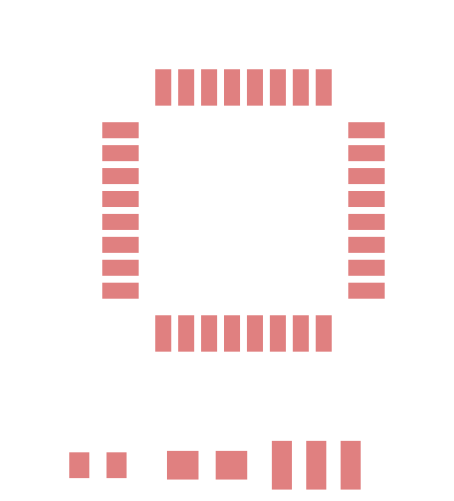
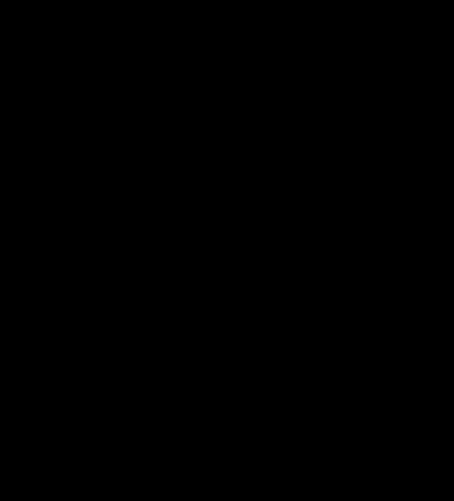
part: (243, 210) -> none
part: (97, 465) -> none
part: (207, 465) -> none
part: (316, 465) -> none

